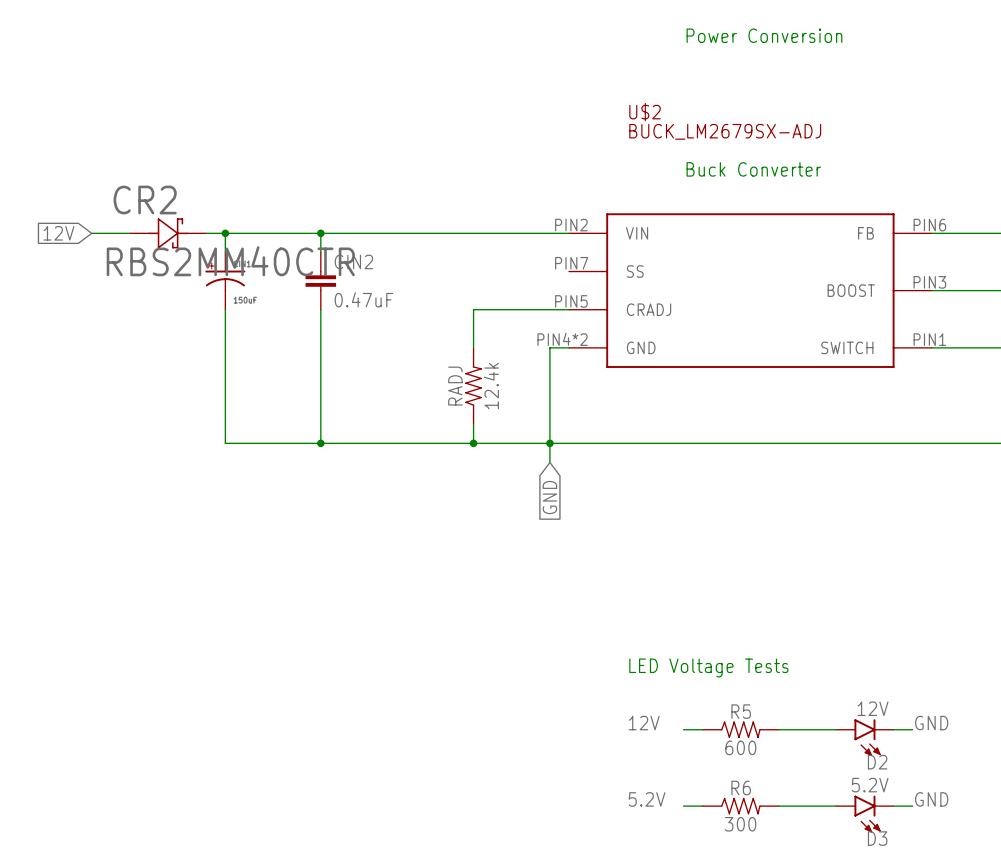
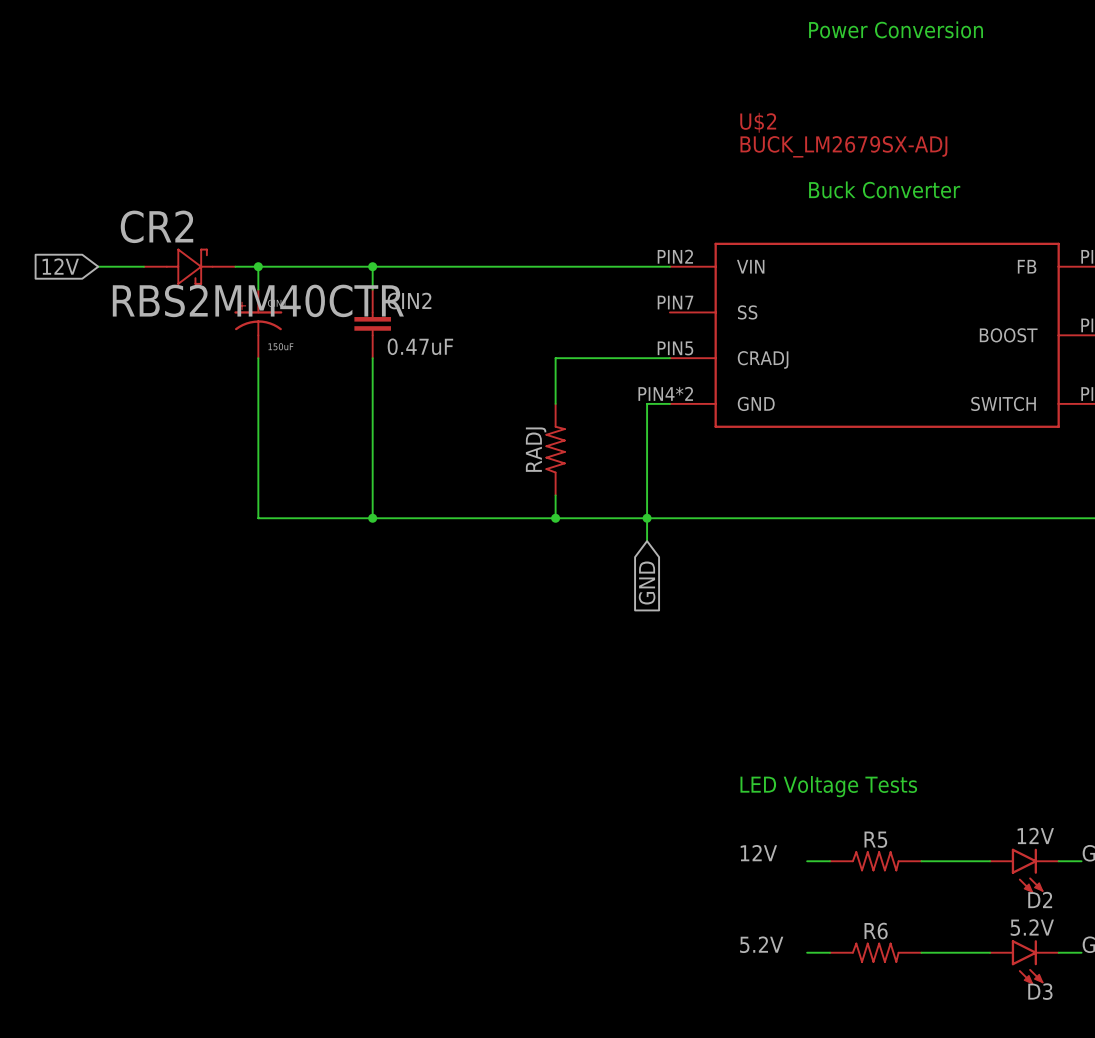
RADJ value: 12.4k (491, 386) -> none
R5 value: 600 (740, 747) -> none
R6 value: 300 (740, 824) -> none

